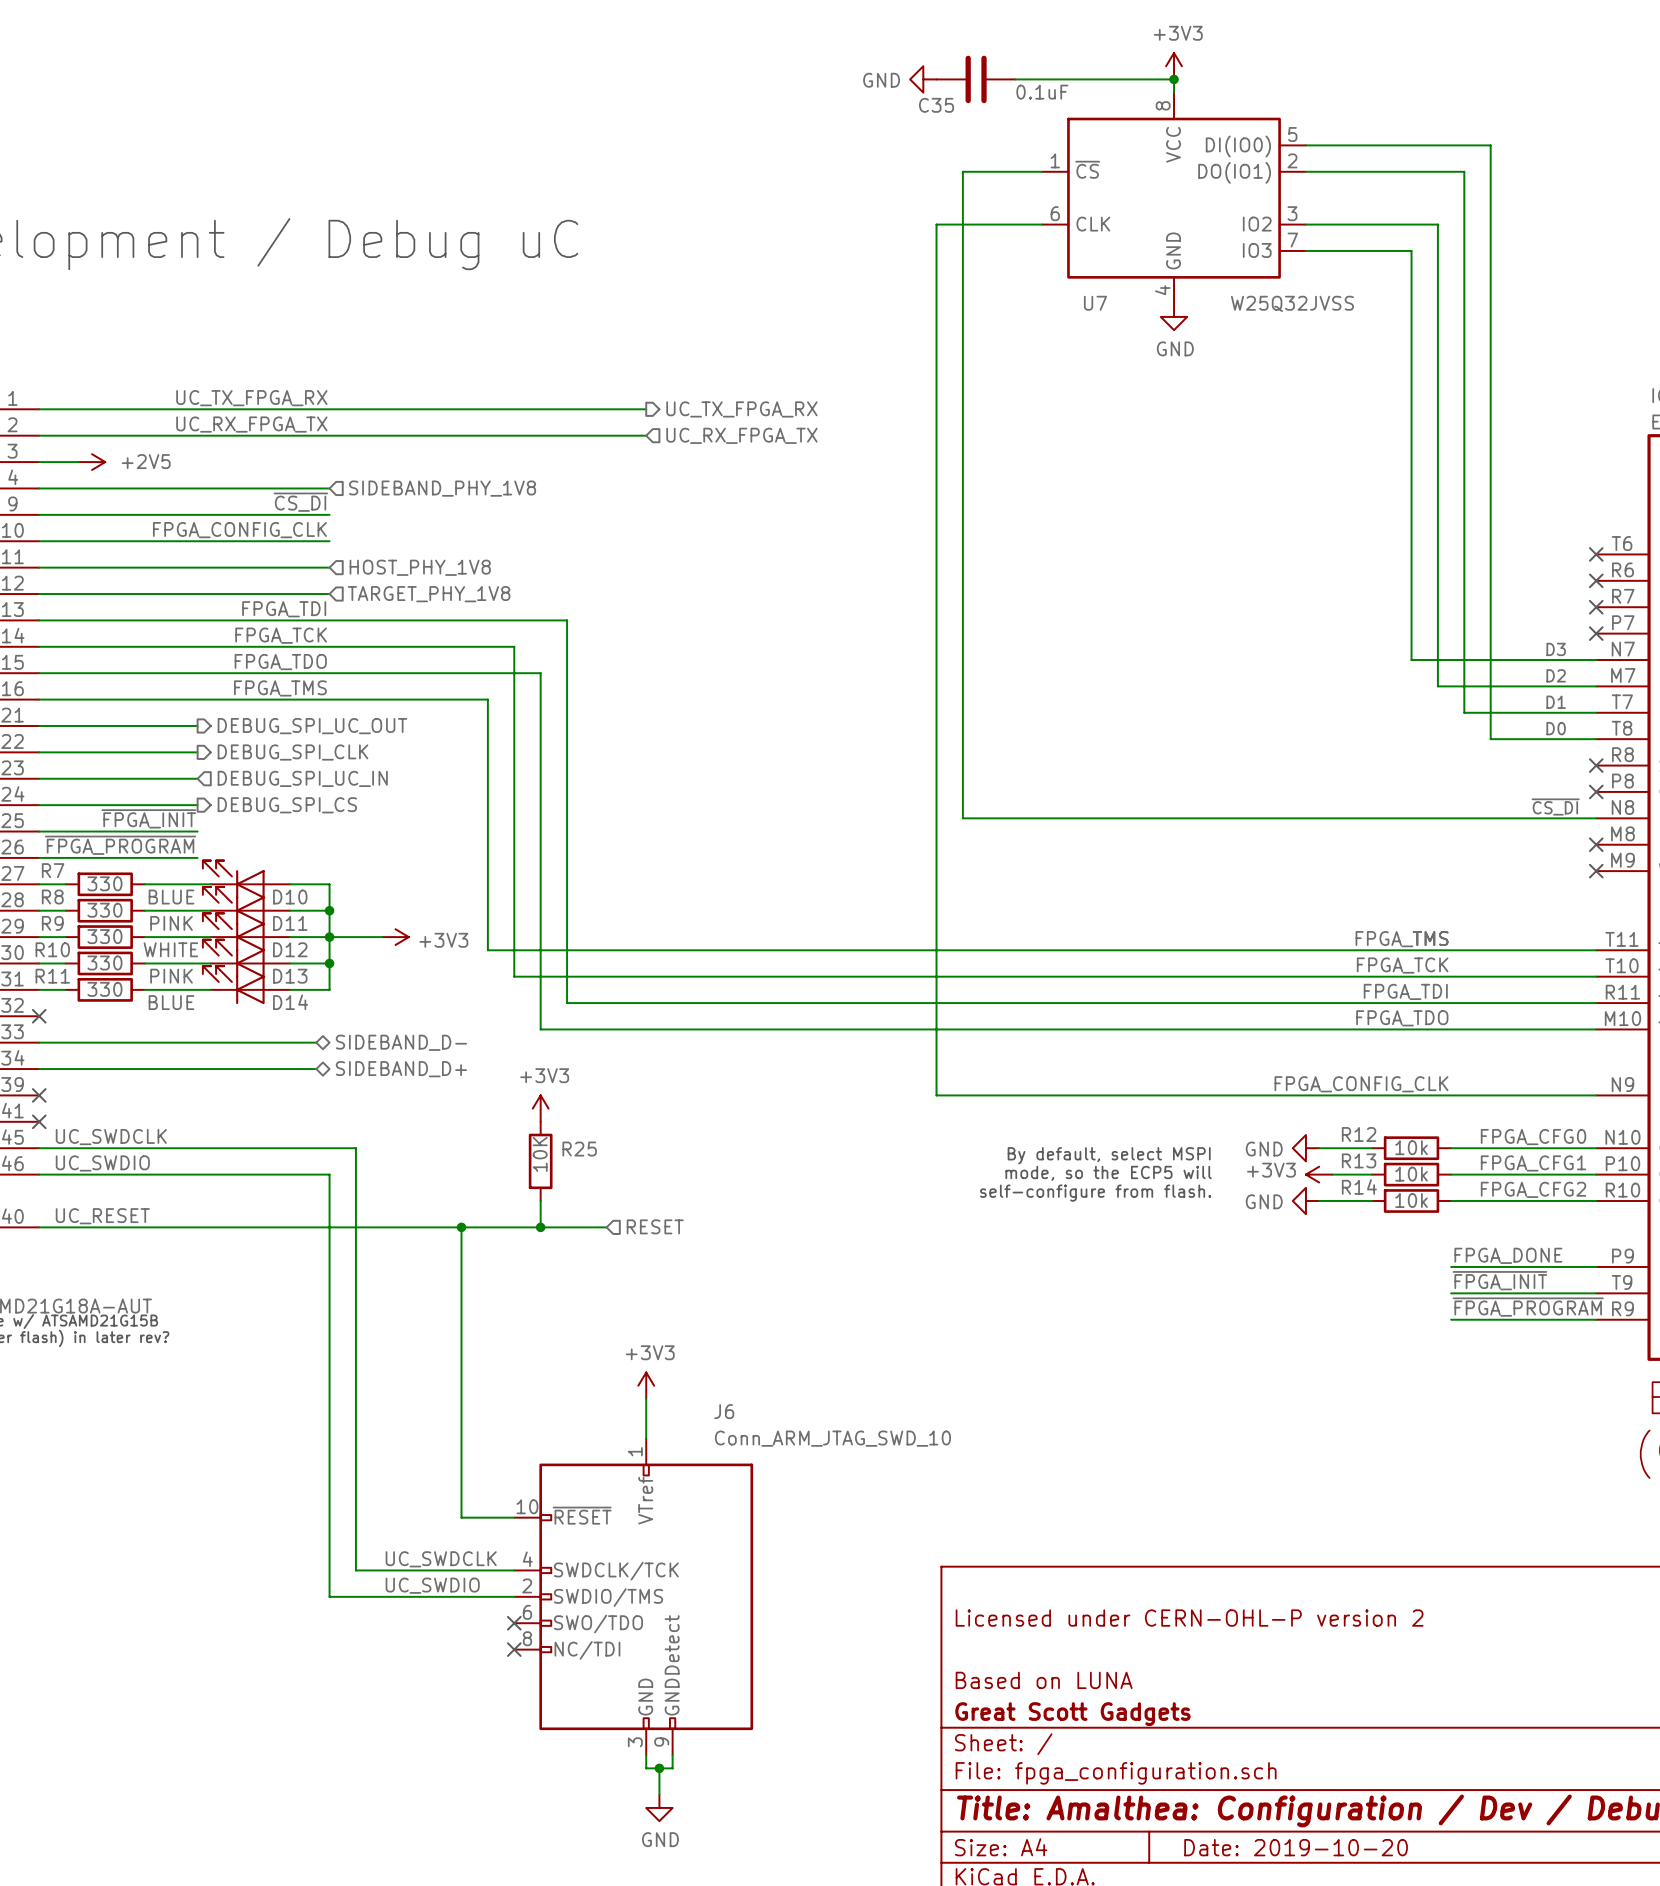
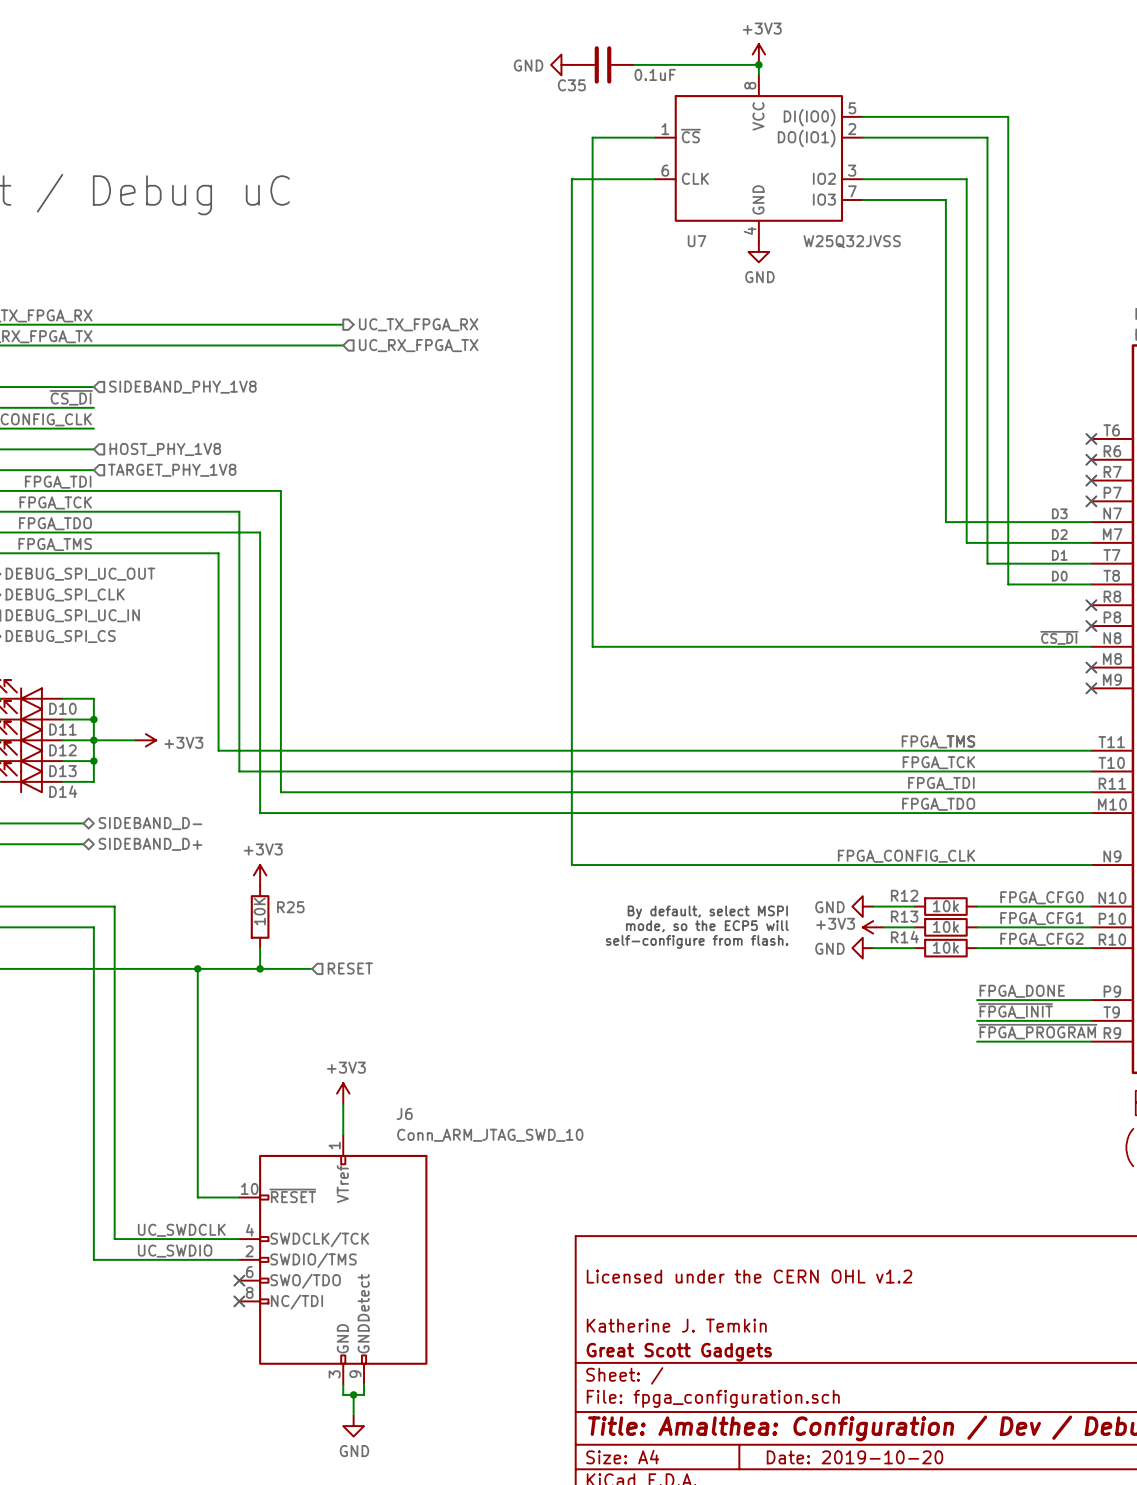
title block: Licensed under CERN-OHL-P version 2 (1189, 1618) -> Licensed under the CERN OHL v1.2 (749, 1276)
title block: Based on LUNA (1044, 1680) -> Katherine J. Temkin (676, 1325)

